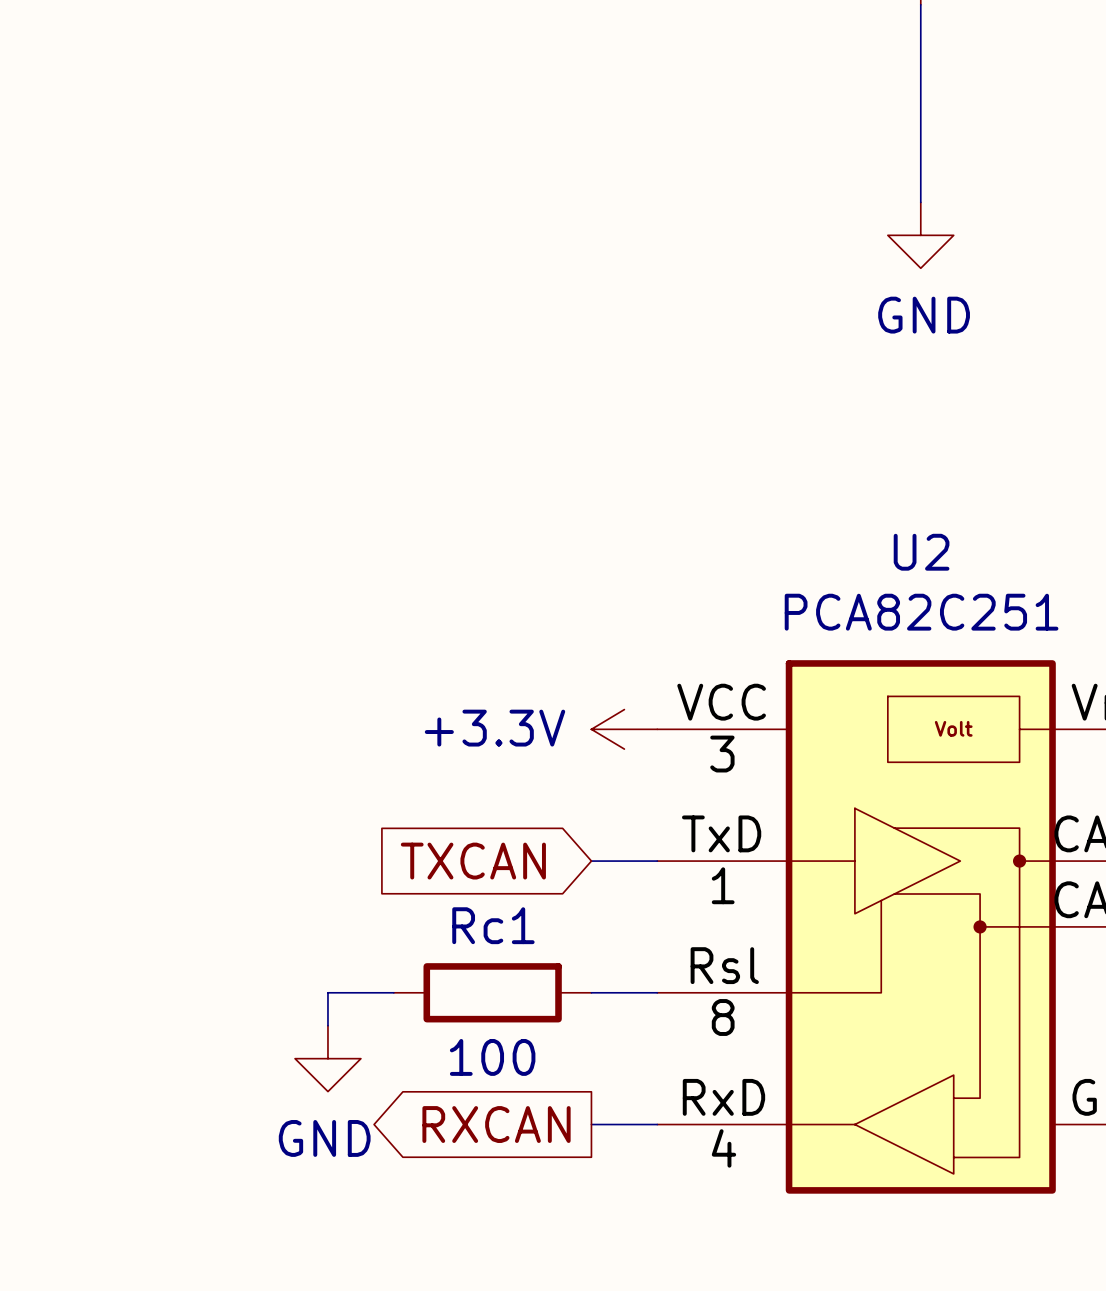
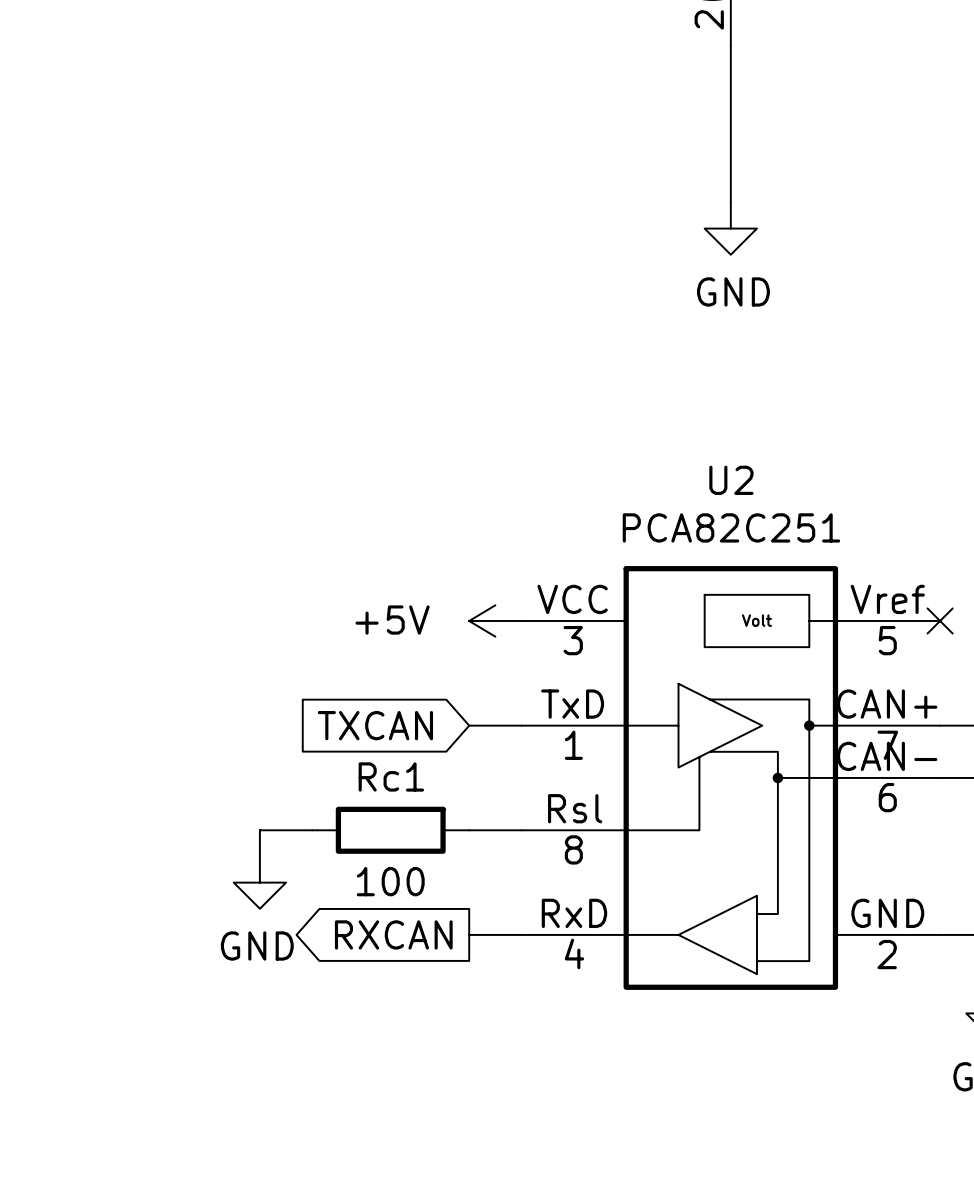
power symbol: +3.3V (624, 729) -> +5V (495, 621)

